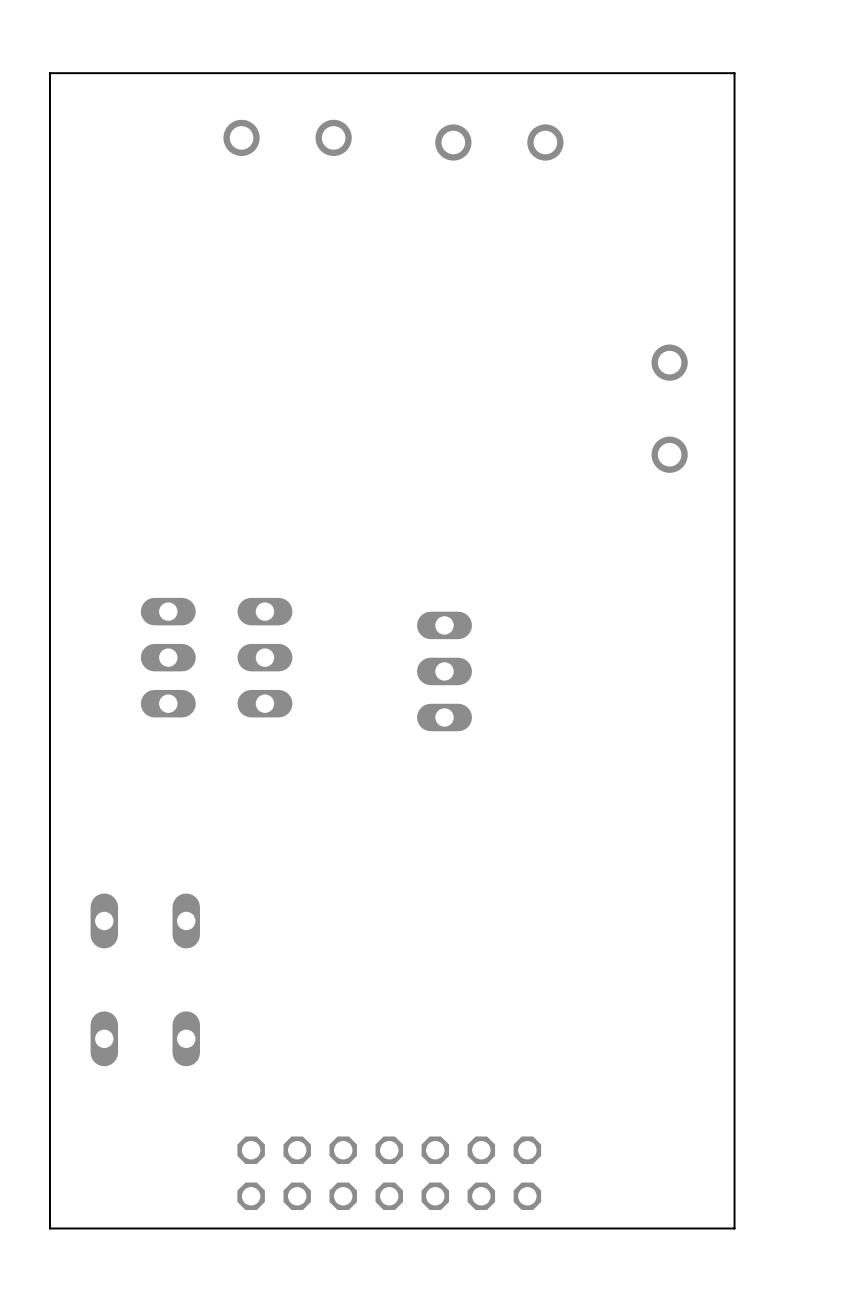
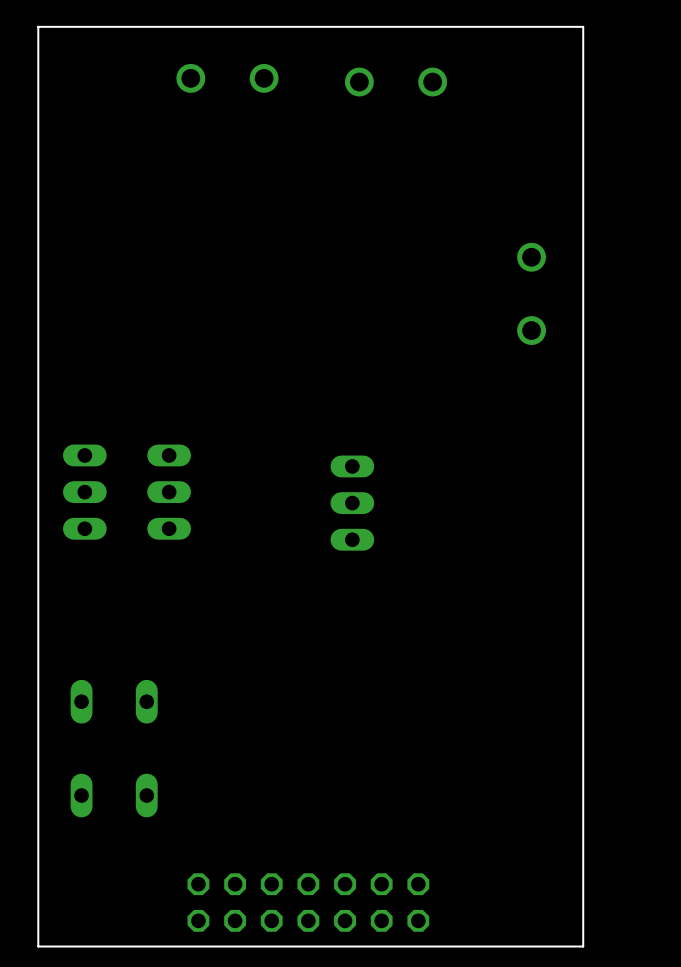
part: none -> (84, 492)
part: (168, 657) -> none
part: none -> (169, 492)
part: (264, 657) -> none

